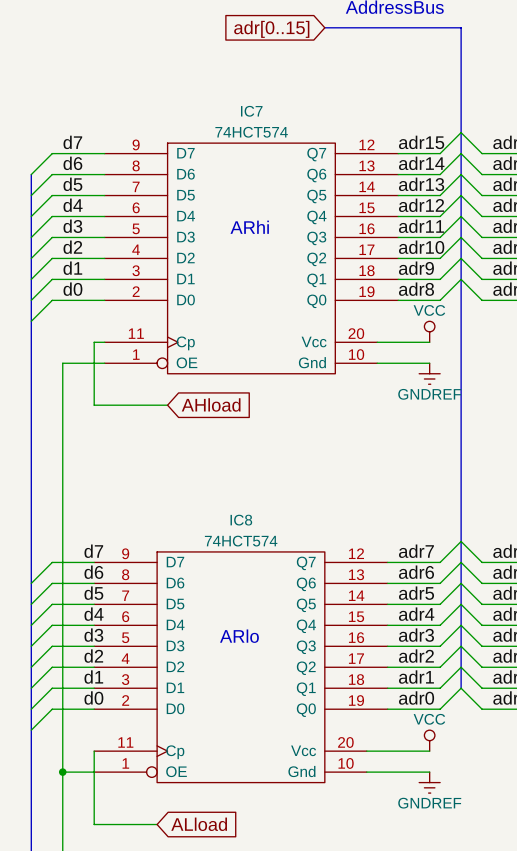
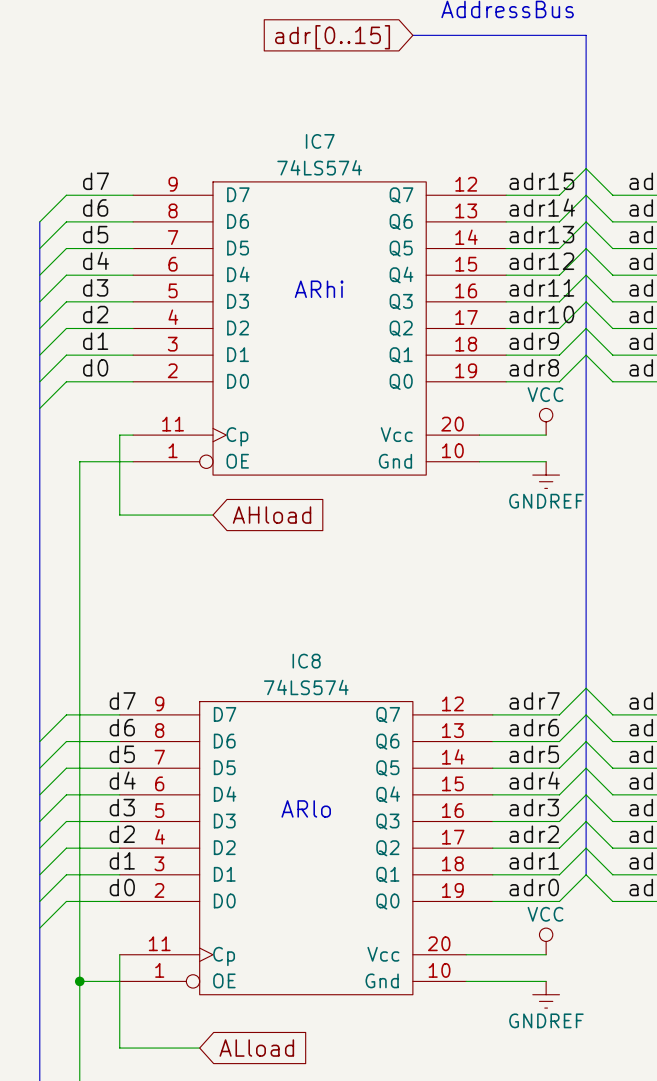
IC7 value: 74HCT574 (251, 132) -> 74LS574 (319, 167)
IC8 value: 74HCT574 (241, 541) -> 74LS574 (306, 687)

